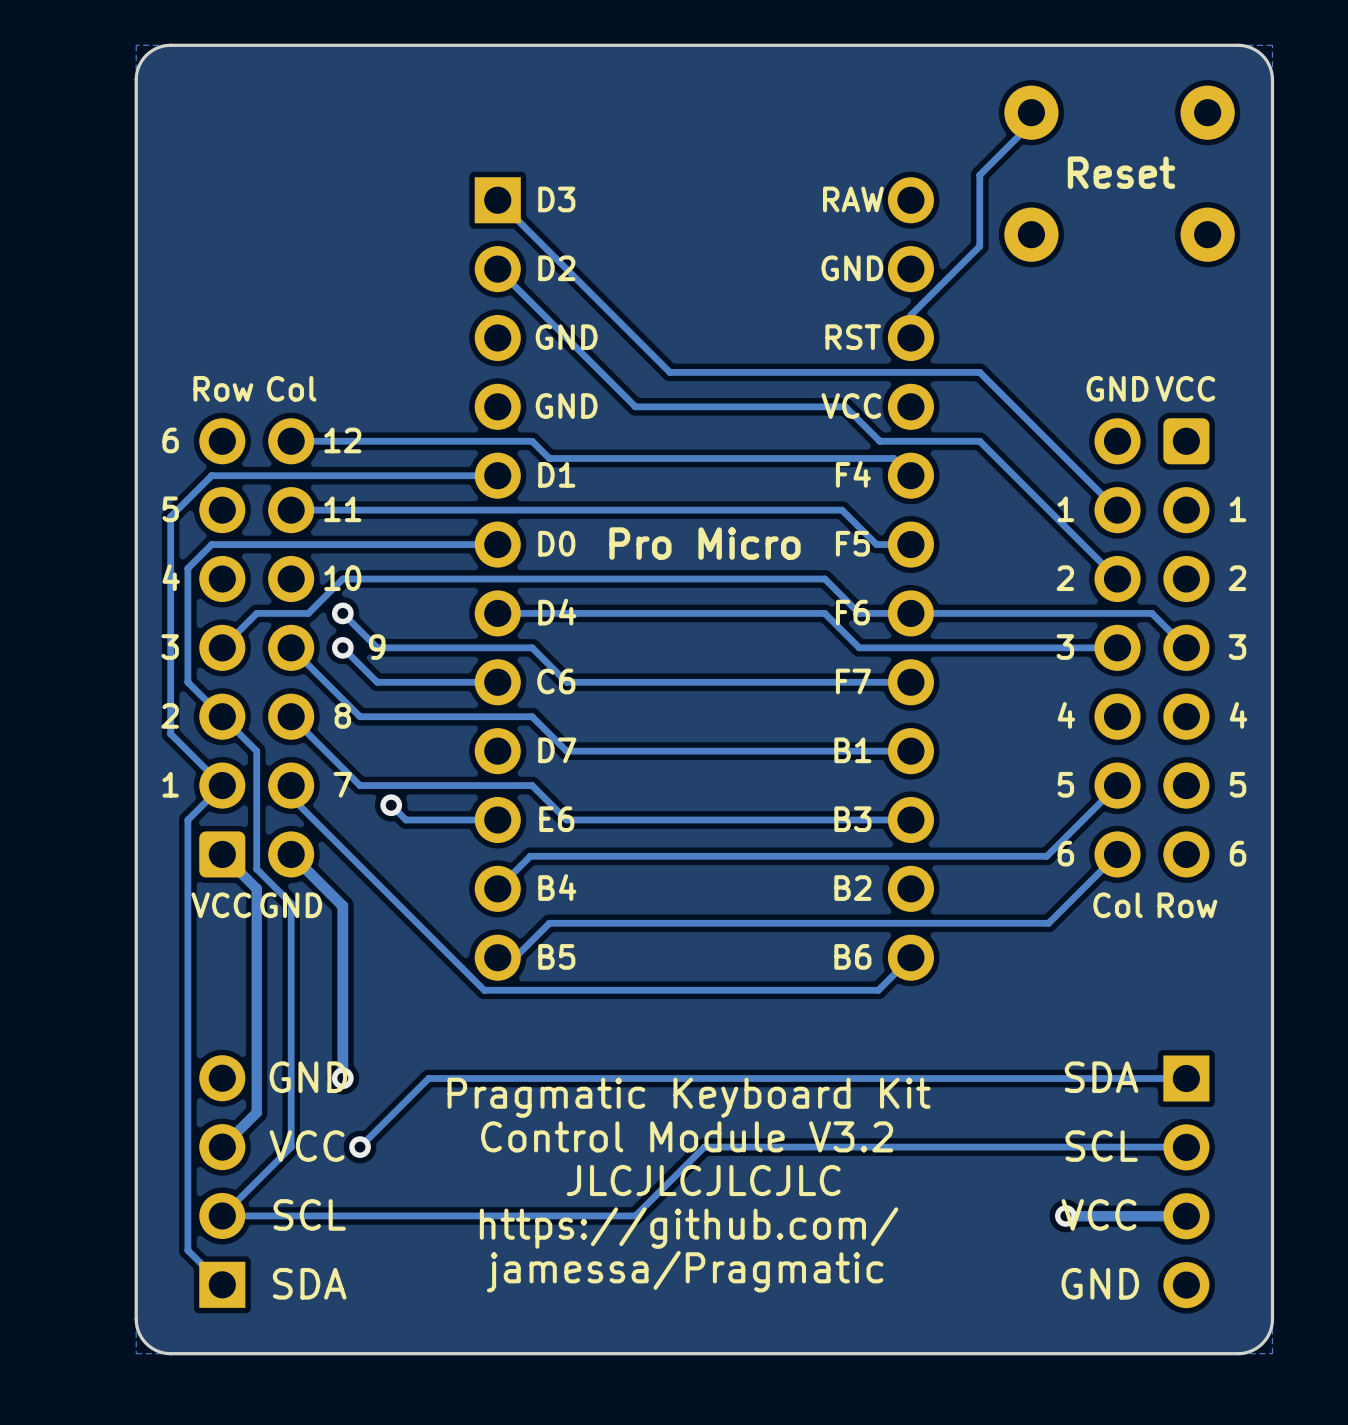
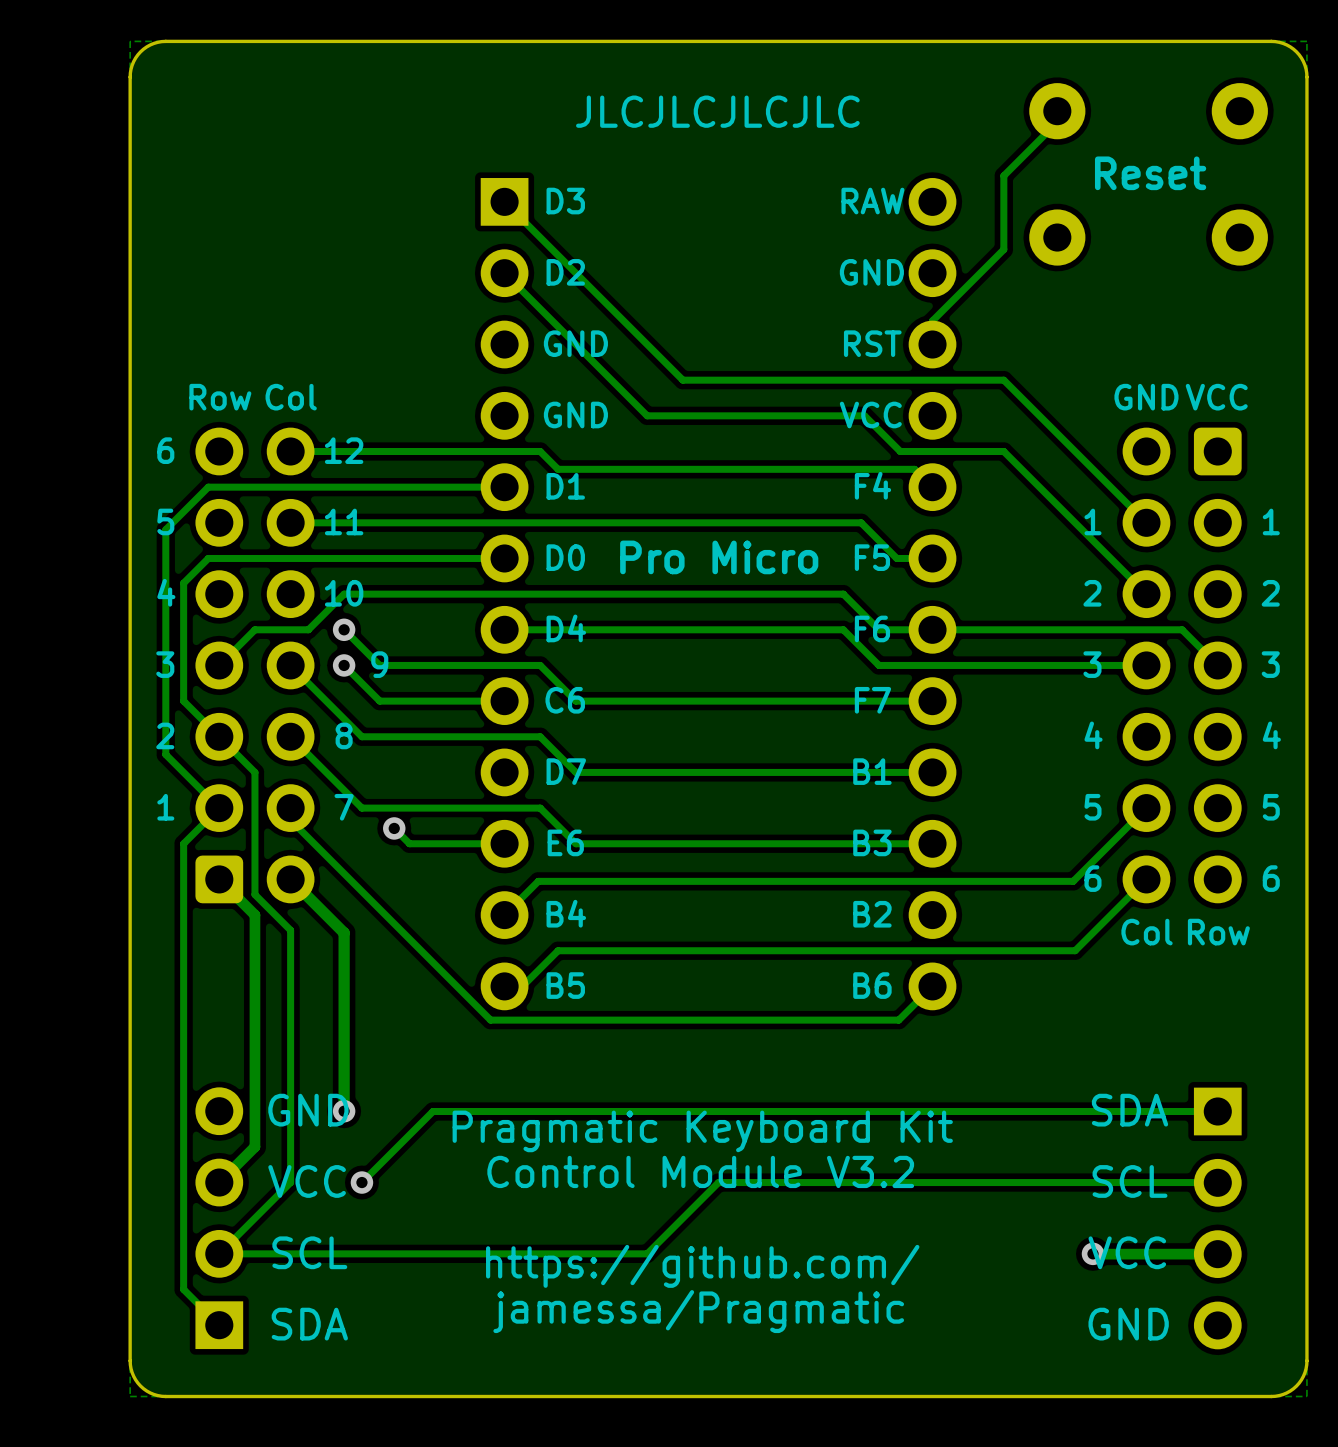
drawing: none -> [576, 95, 860, 128]
text: VCC (221, 905) -> none
text: GND (291, 905) -> none
drawing: [566, 1164, 841, 1197] -> none

